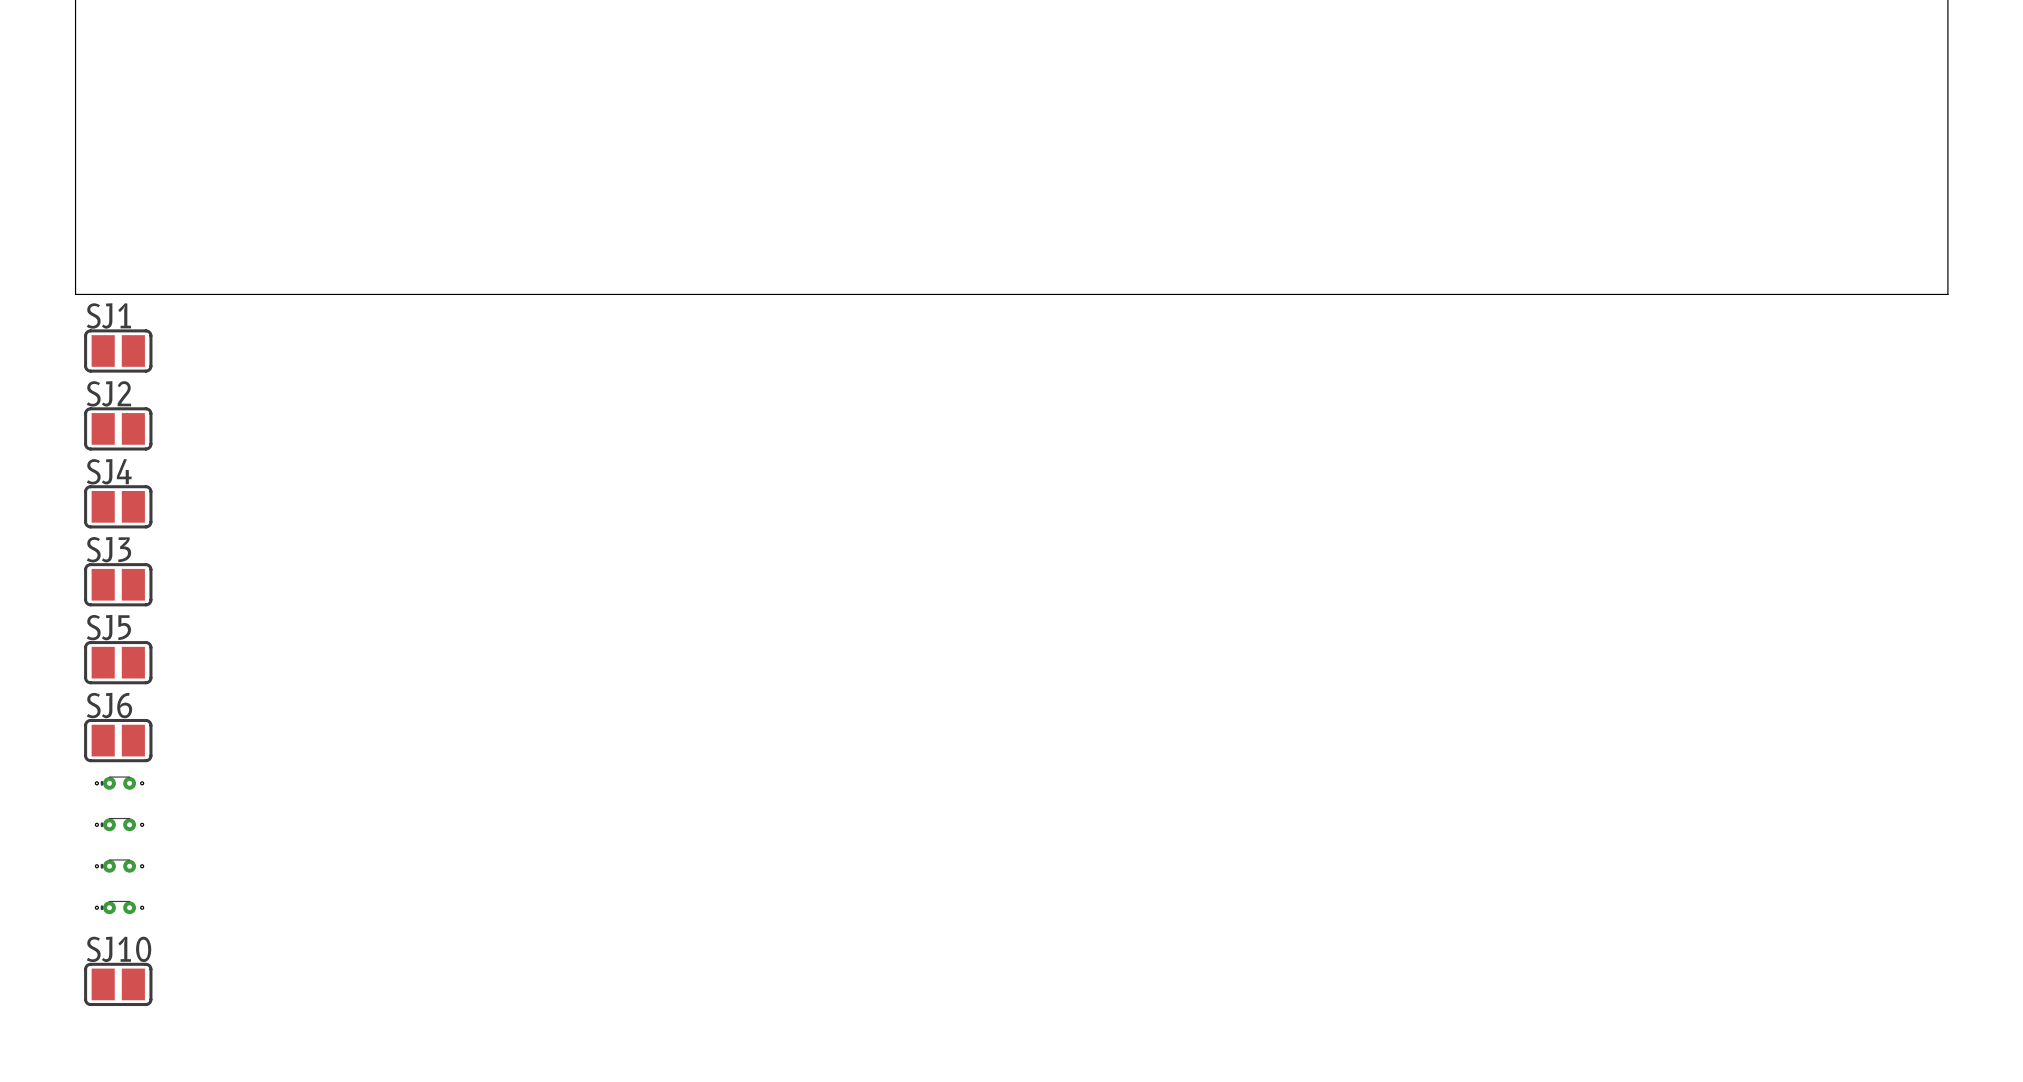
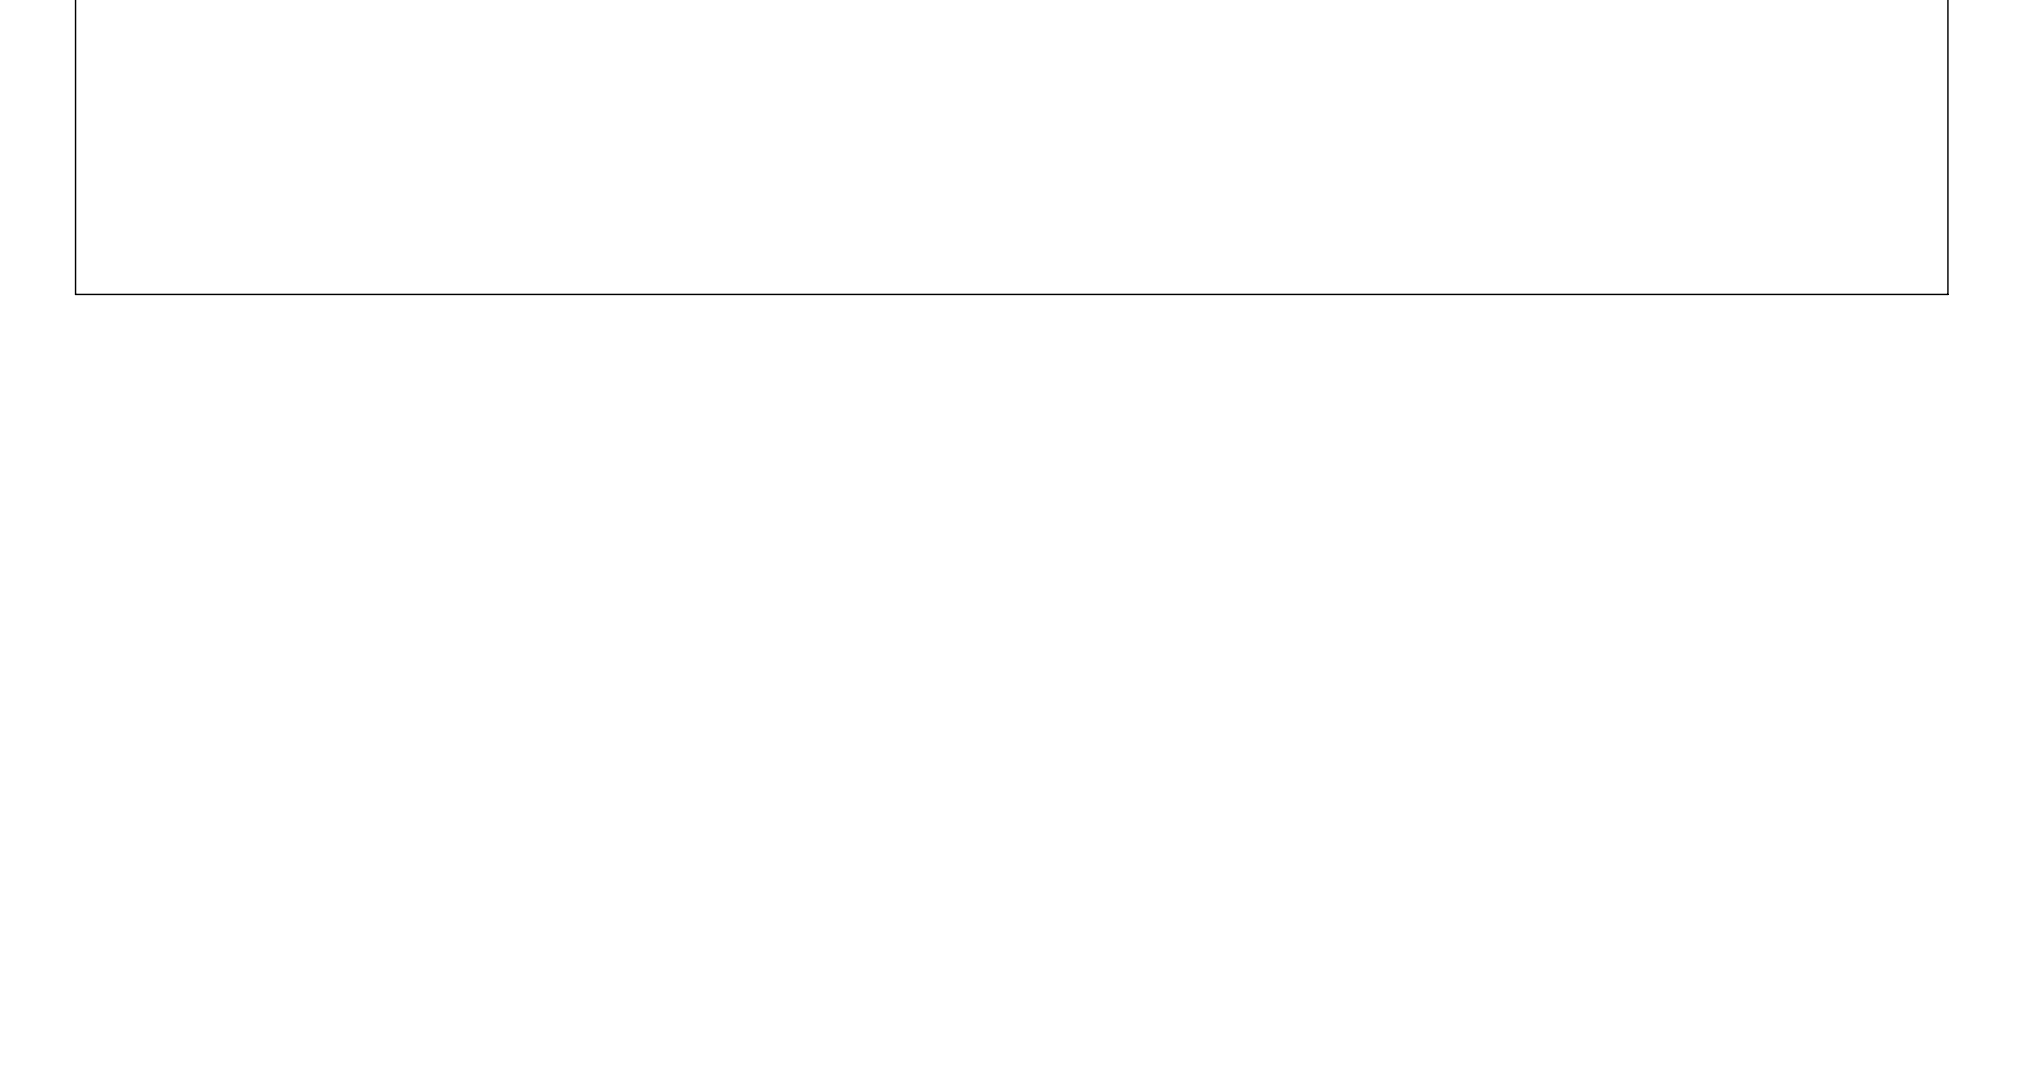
SJ1: (118, 350) -> none
SJ2: (118, 428) -> none
SJ4: (118, 506) -> none
SJ3: (118, 584) -> none
SJ5: (118, 662) -> none
SJ6: (118, 740) -> none
part: (119, 783) -> none
part: (119, 824) -> none
part: (119, 866) -> none
part: (119, 907) -> none
SJ10: (118, 984) -> none

